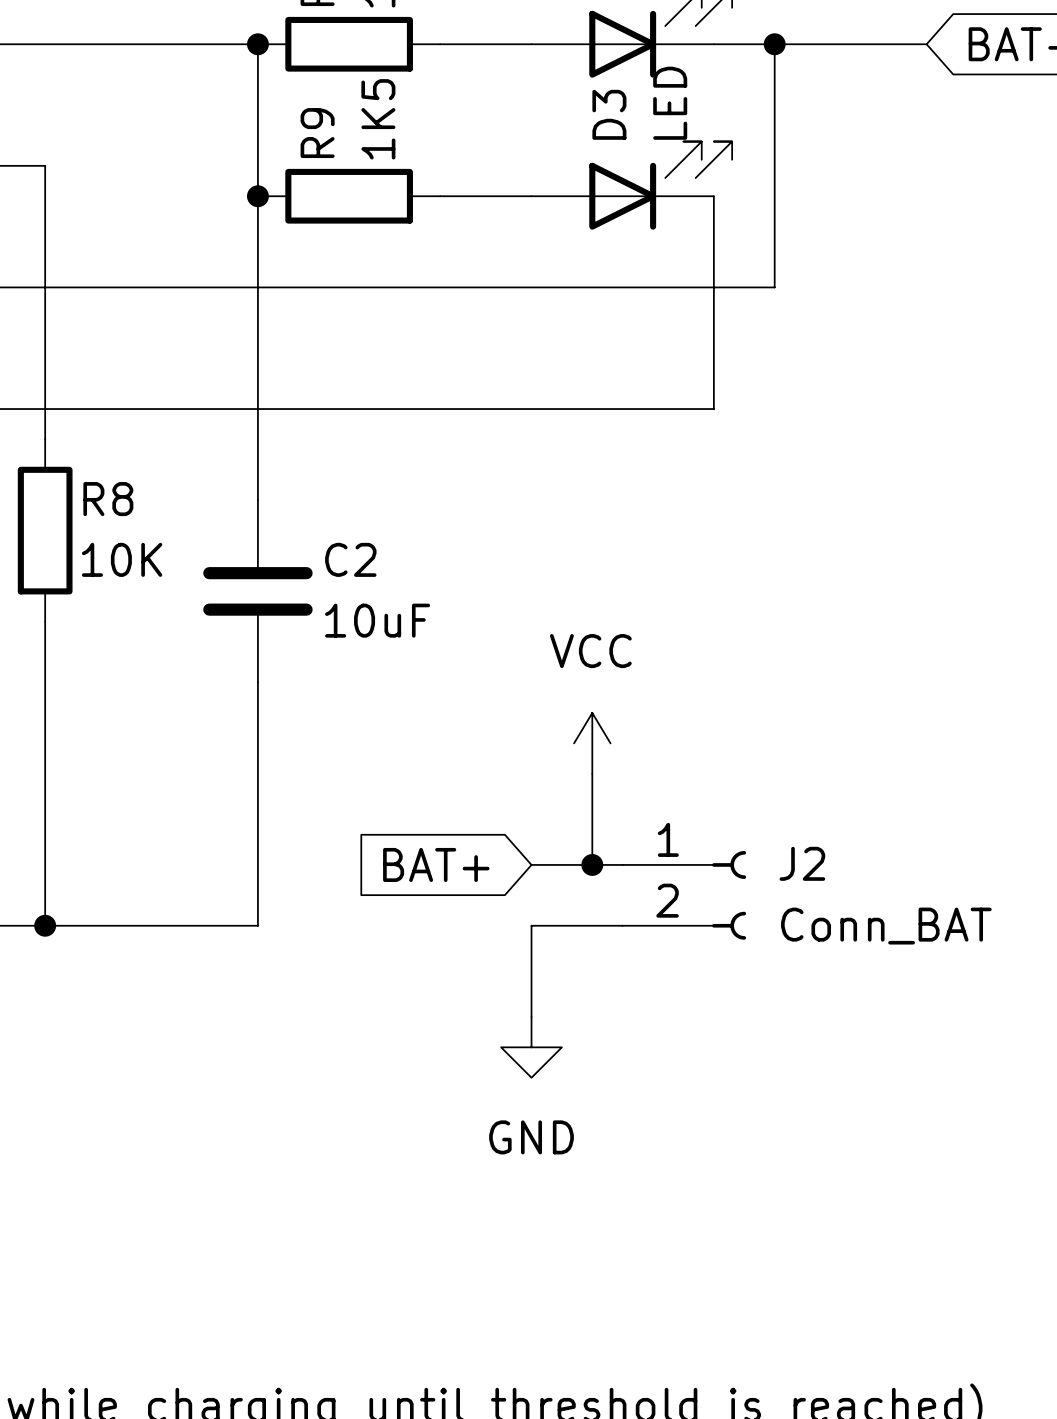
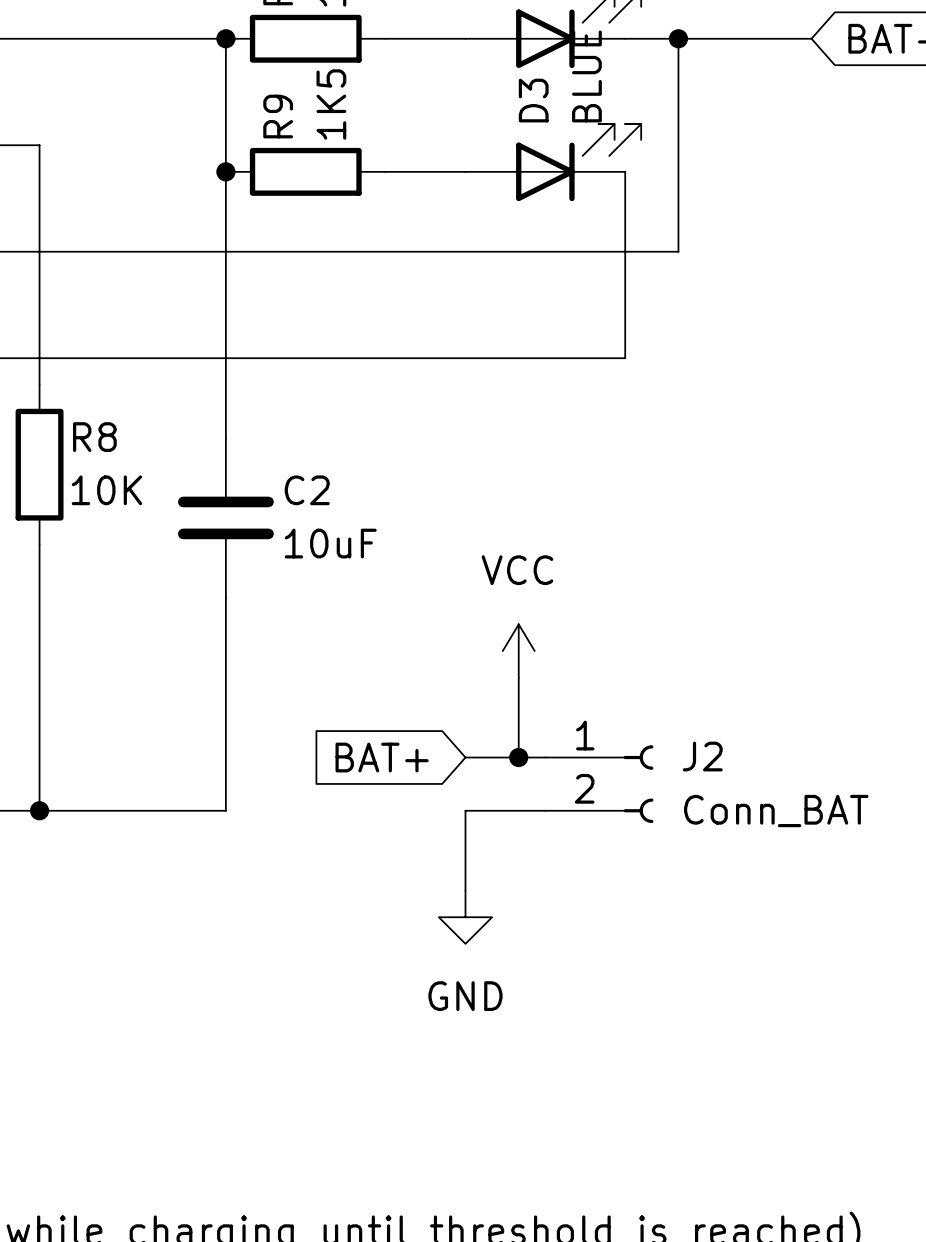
D3 value: LED (670, 103) -> BLUE (586, 76)

